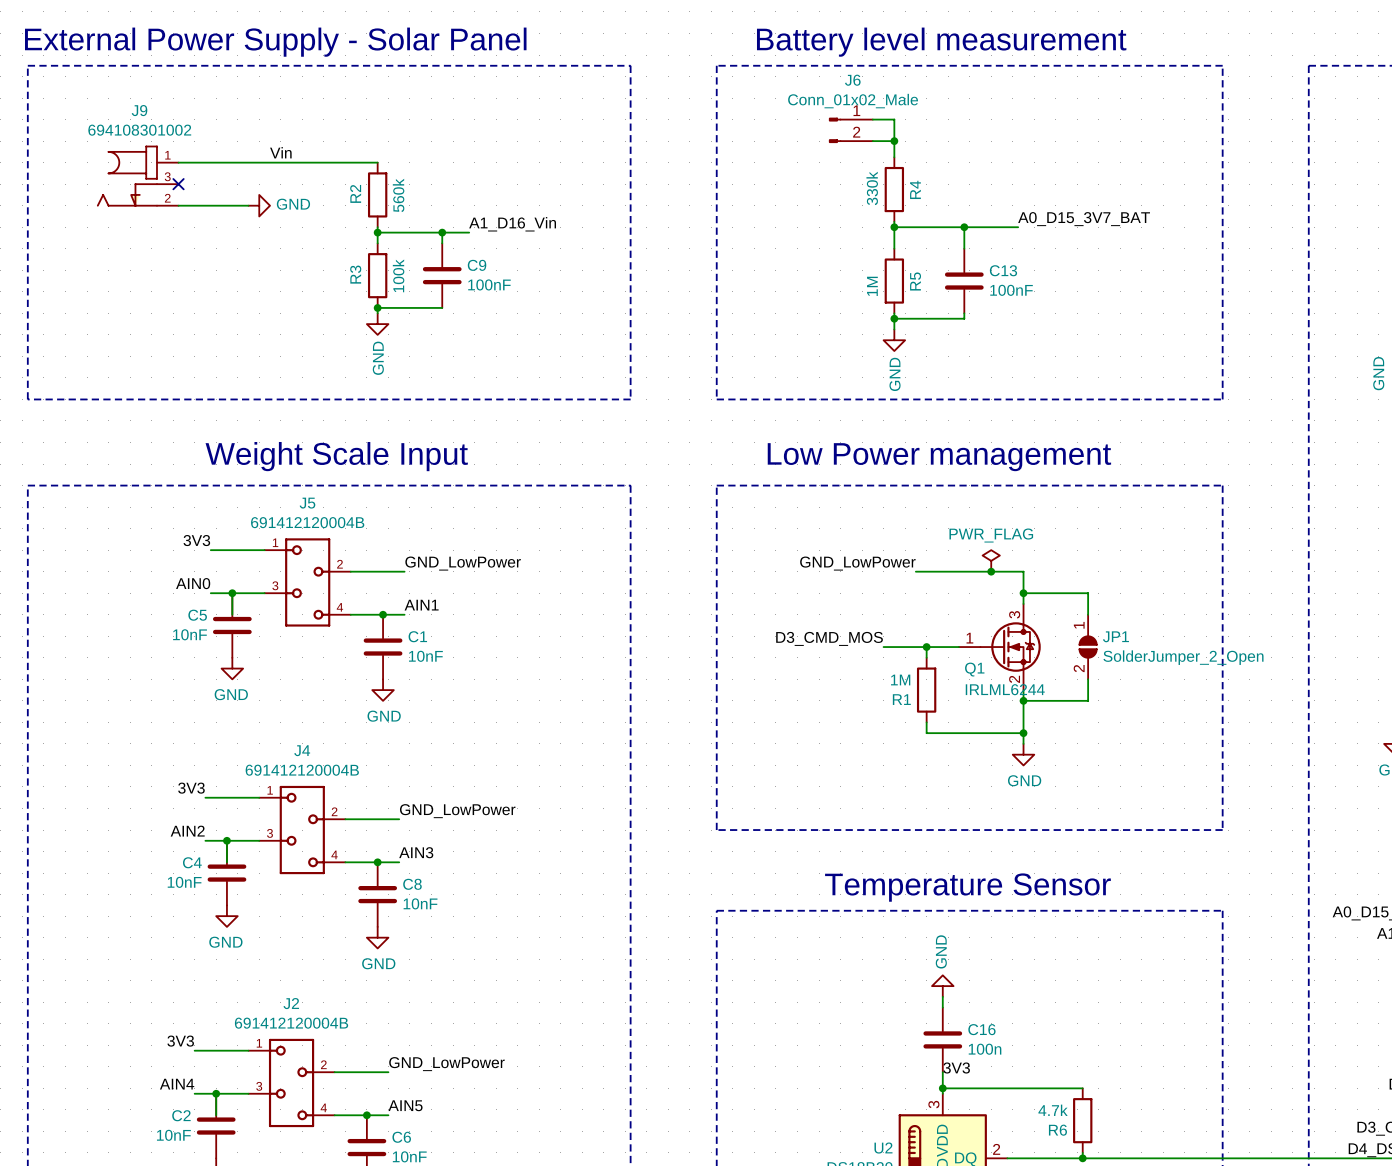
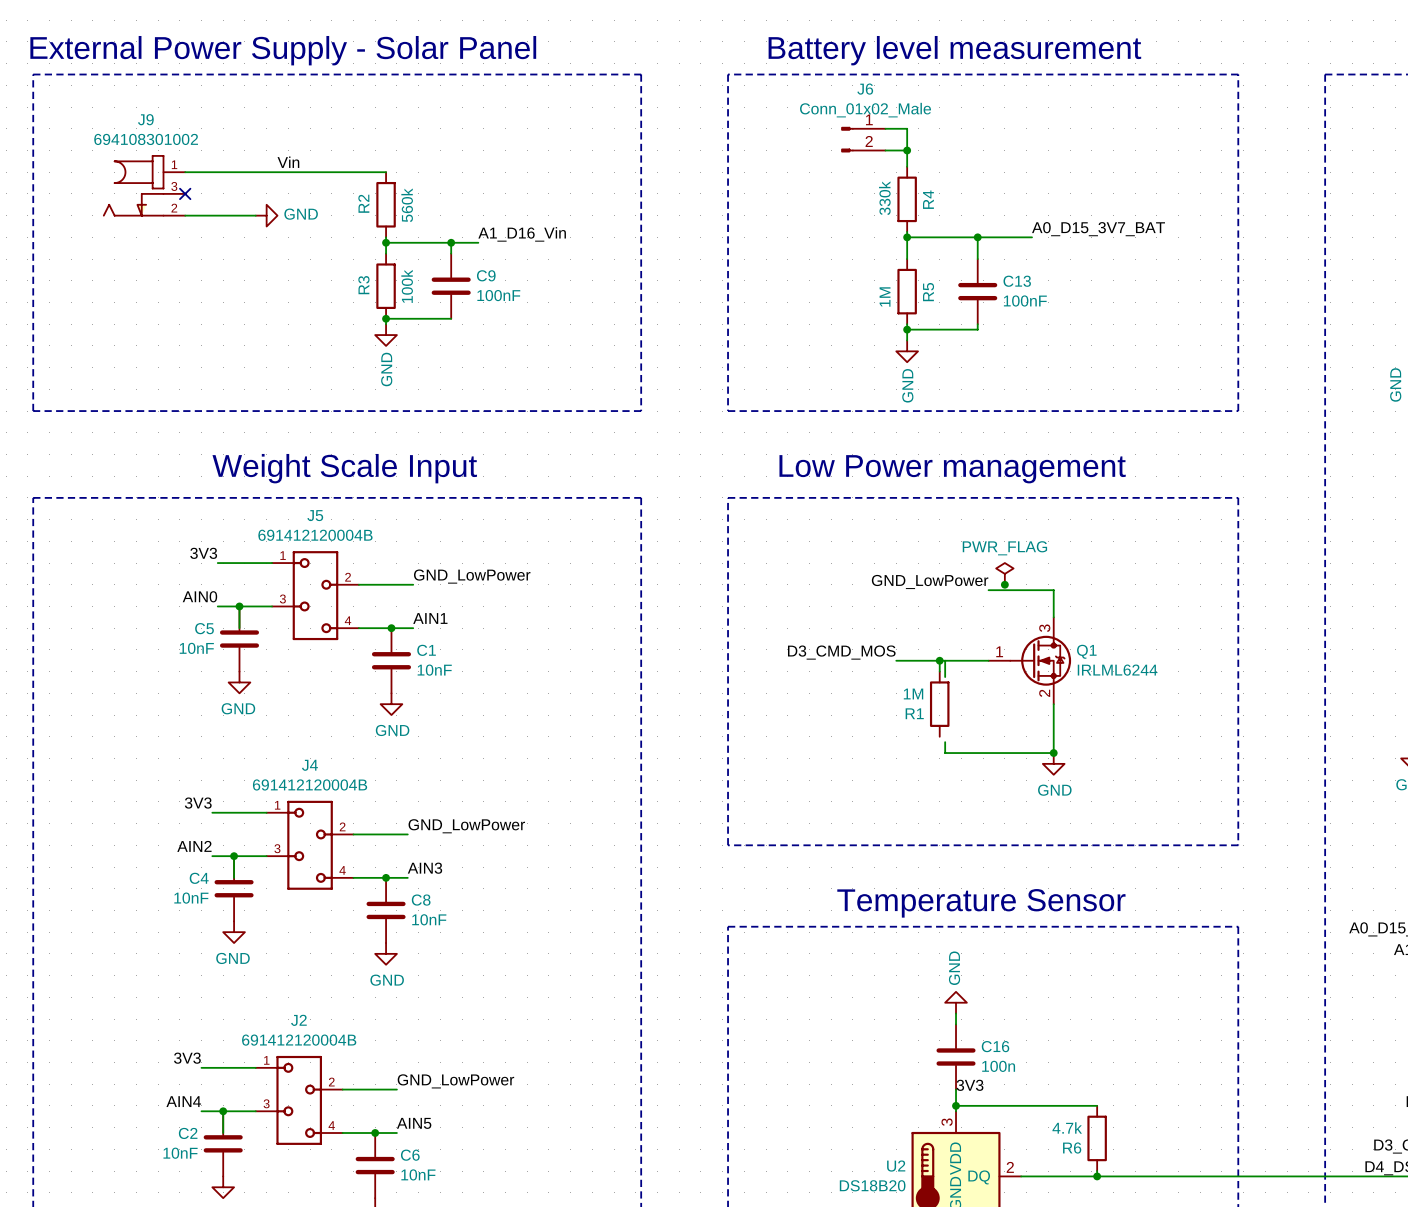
label position: GND_LowPower (857, 563) -> GND_LowPower (930, 581)
wire: (915, 571) (1023, 571) (1023, 603) -> none
wire: none -> (988, 590) (1053, 590) (1053, 617)
wire: (1023, 593) (1088, 593) (1088, 614) -> none
junction: (1023, 593) -> none
wire: none -> (945, 660) (945, 677)
Q1 position: (999, 647) -> (1029, 660)
JP1: SolderJumper_2_Open (1088, 647) -> none
Q1 name position: Q1 (974, 669) -> Q1 (1086, 651)
wire: (1088, 679) (1088, 700) (1023, 700) -> none
Q1 value position: IRLML6244 (1005, 689) -> IRLML6244 (1117, 670)
wire: (1023, 690) (1023, 743) -> none
wire: none -> (1053, 704) (1053, 753) (945, 753) (945, 742)
junction: (1023, 700) -> none
wire: (926, 722) (926, 733) (1023, 733) -> none
junction position: (1023, 733) -> (1053, 753)
power symbol position: GND (1023, 754) -> GND (1053, 763)

